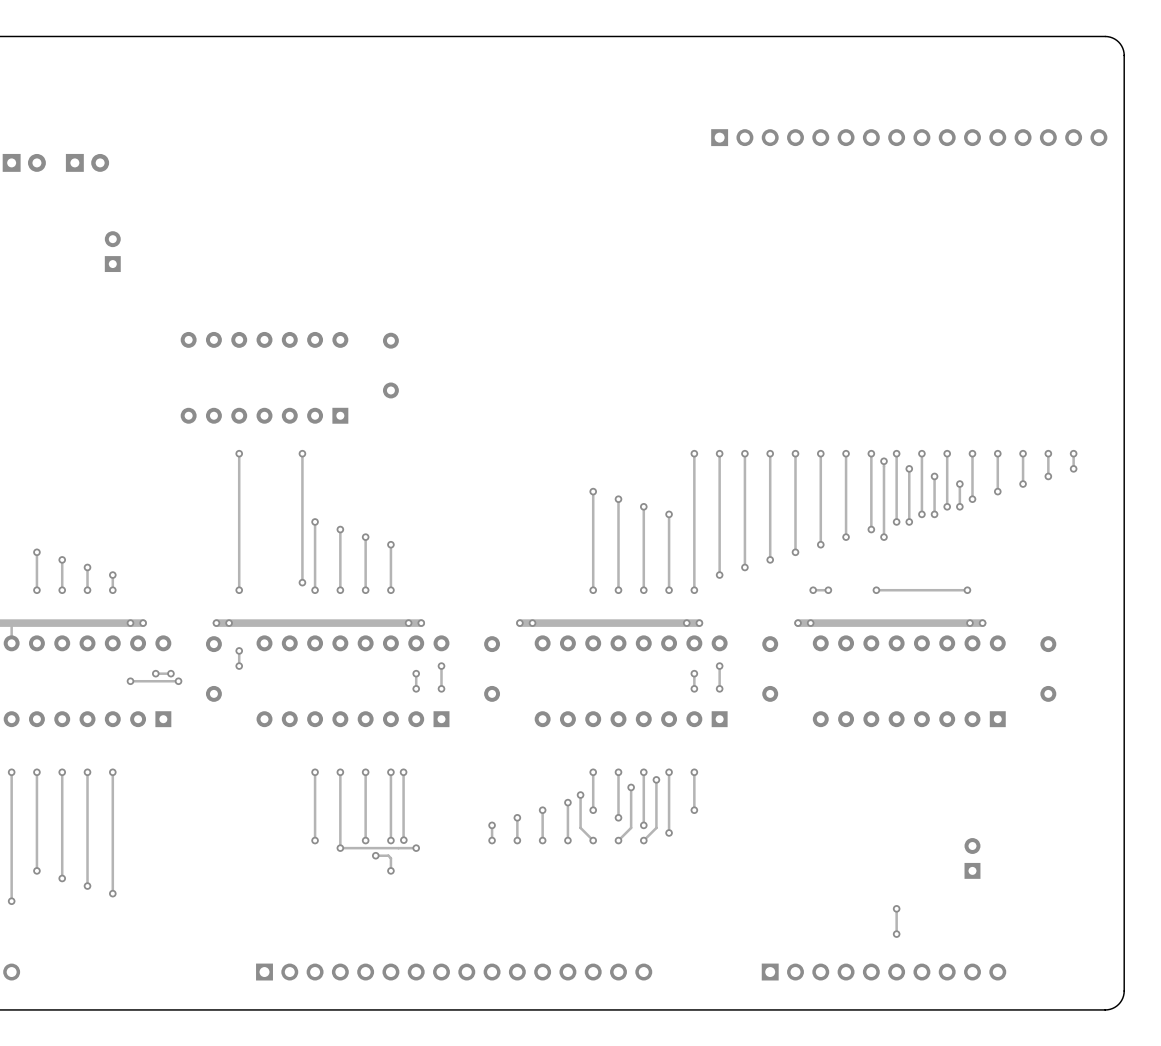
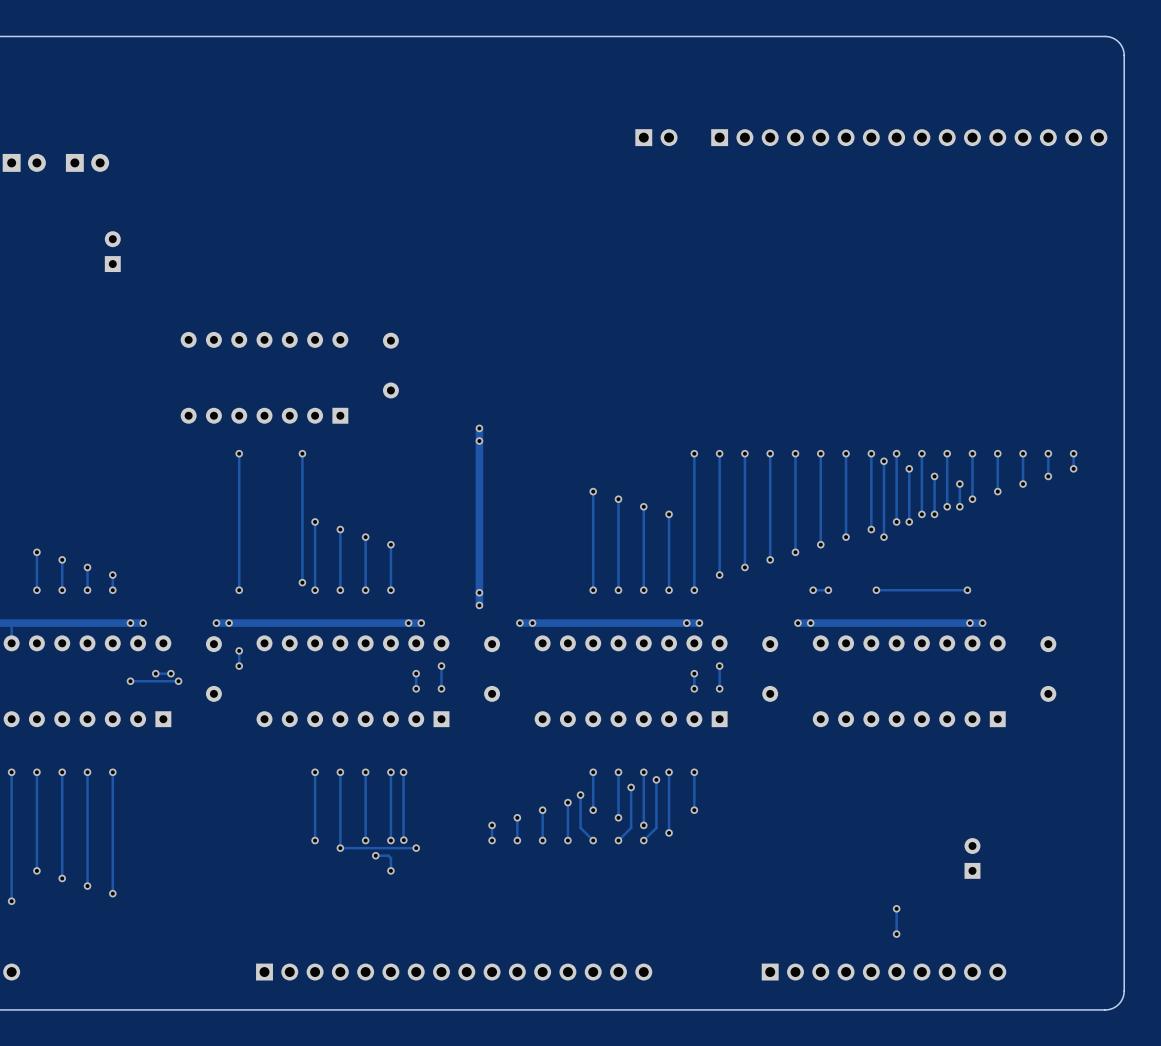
part: none -> (656, 137)
track: none -> (479, 428) (479, 605)
via: none -> (479, 428)
via: none -> (479, 441)
via: none -> (479, 592)
via: none -> (479, 605)

